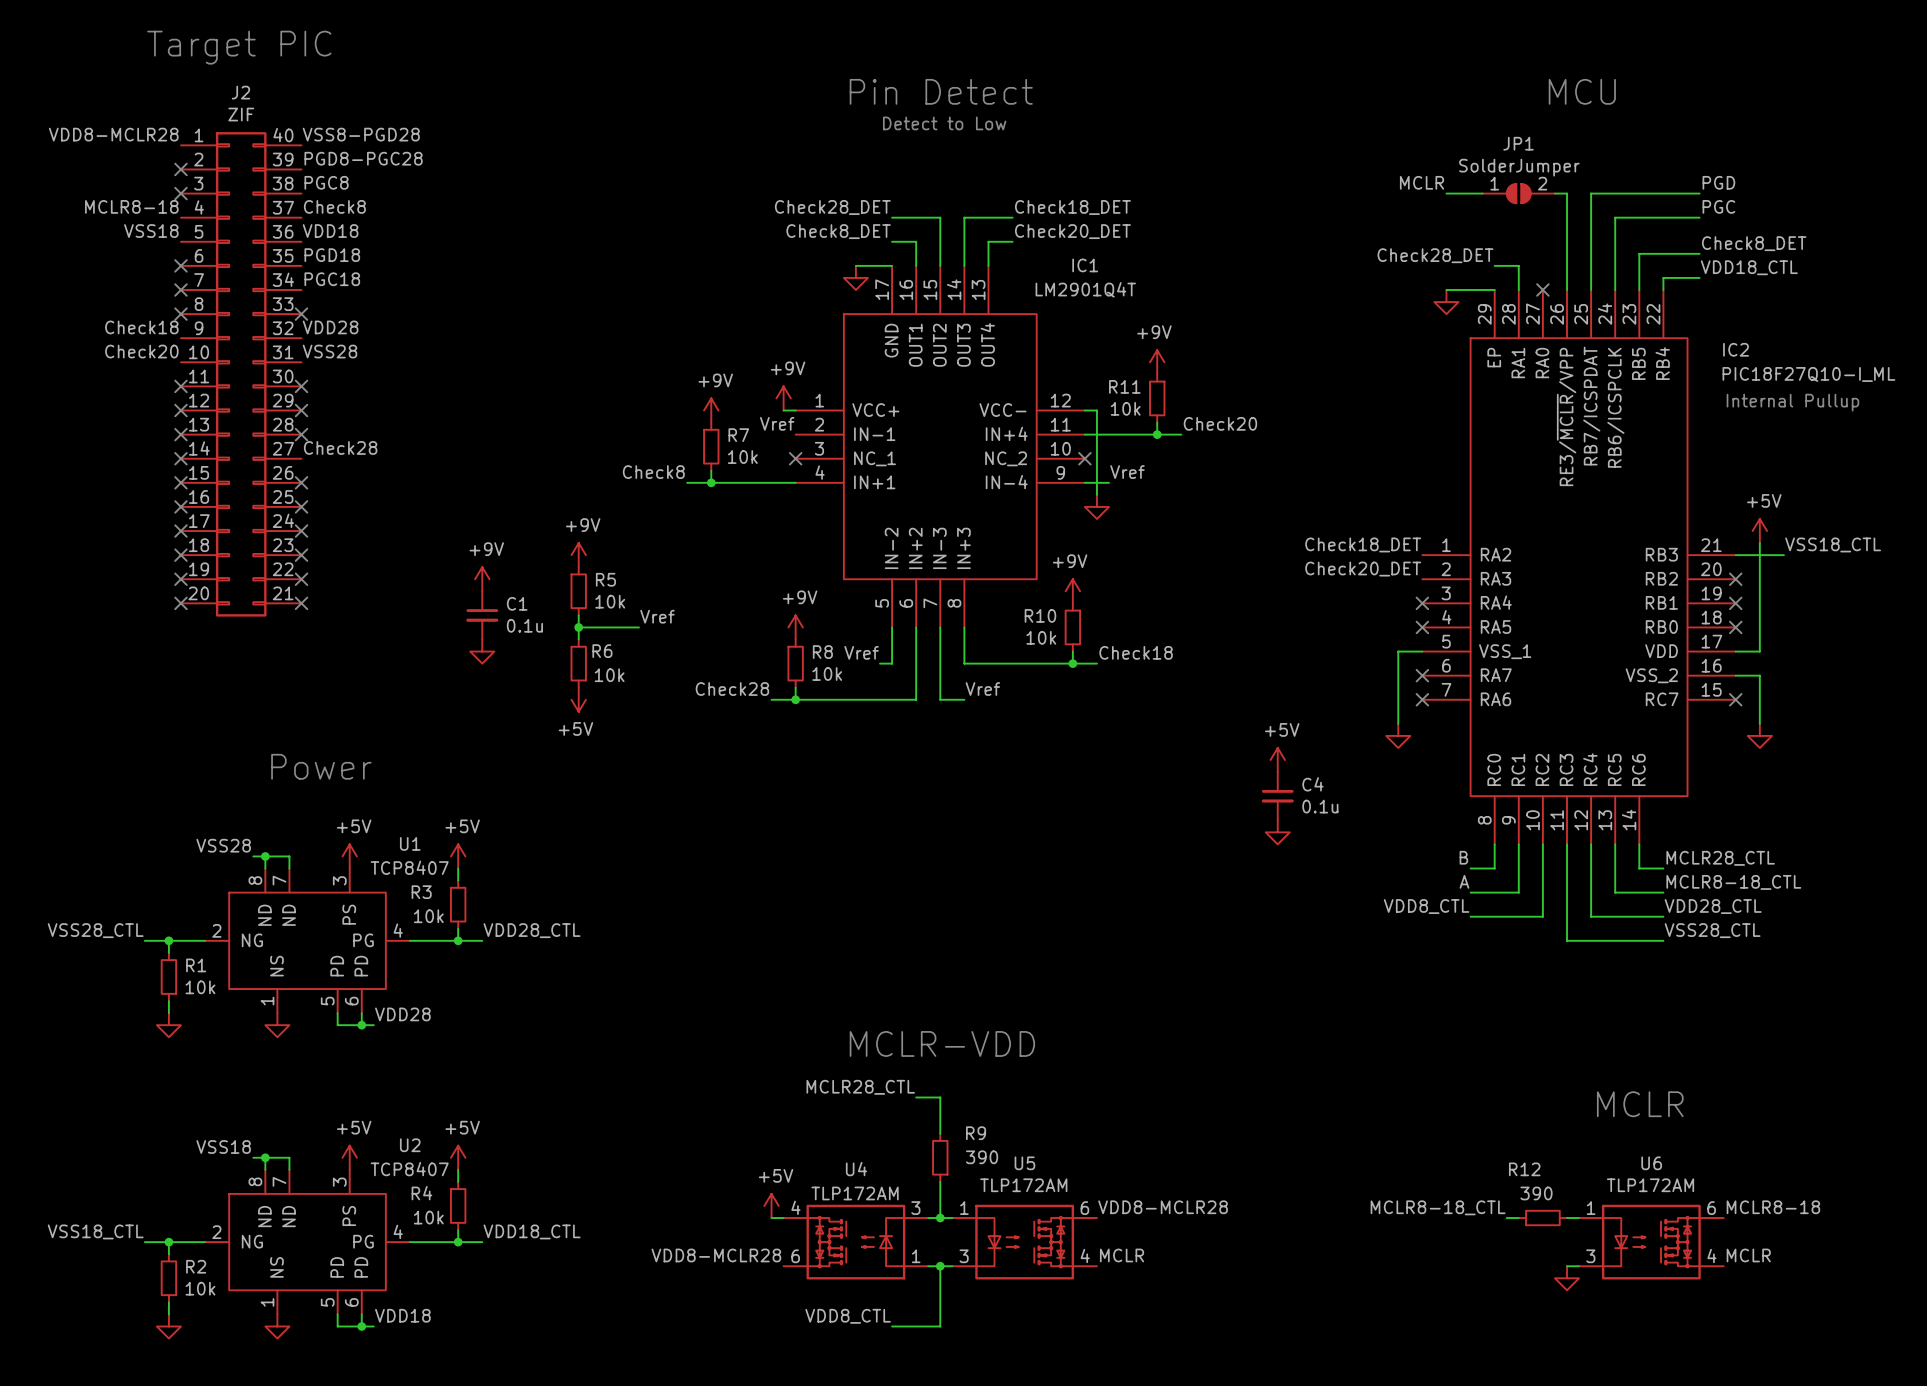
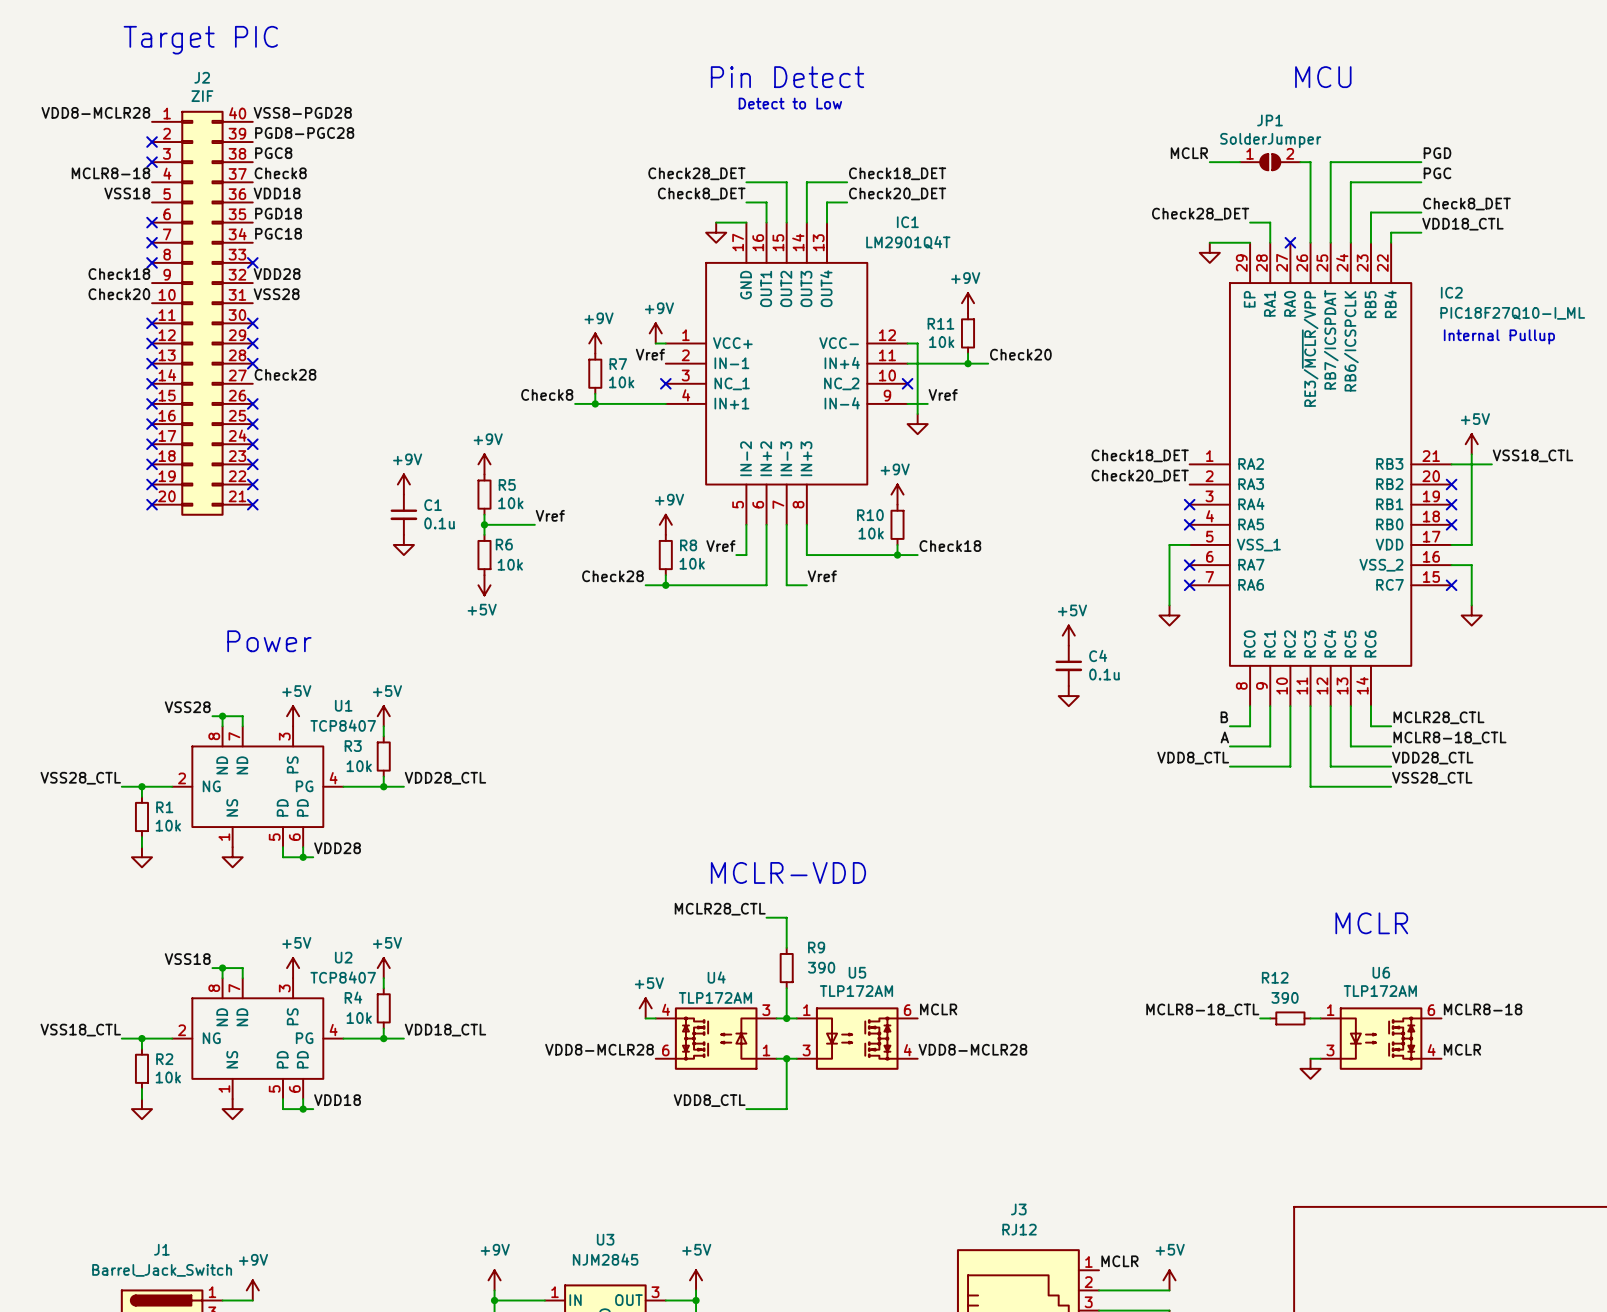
label: VDD8-MCLR28 (1163, 1207) -> MCLR (938, 1009)
label: MCLR (1122, 1255) -> VDD8-MCLR28 (972, 1049)

